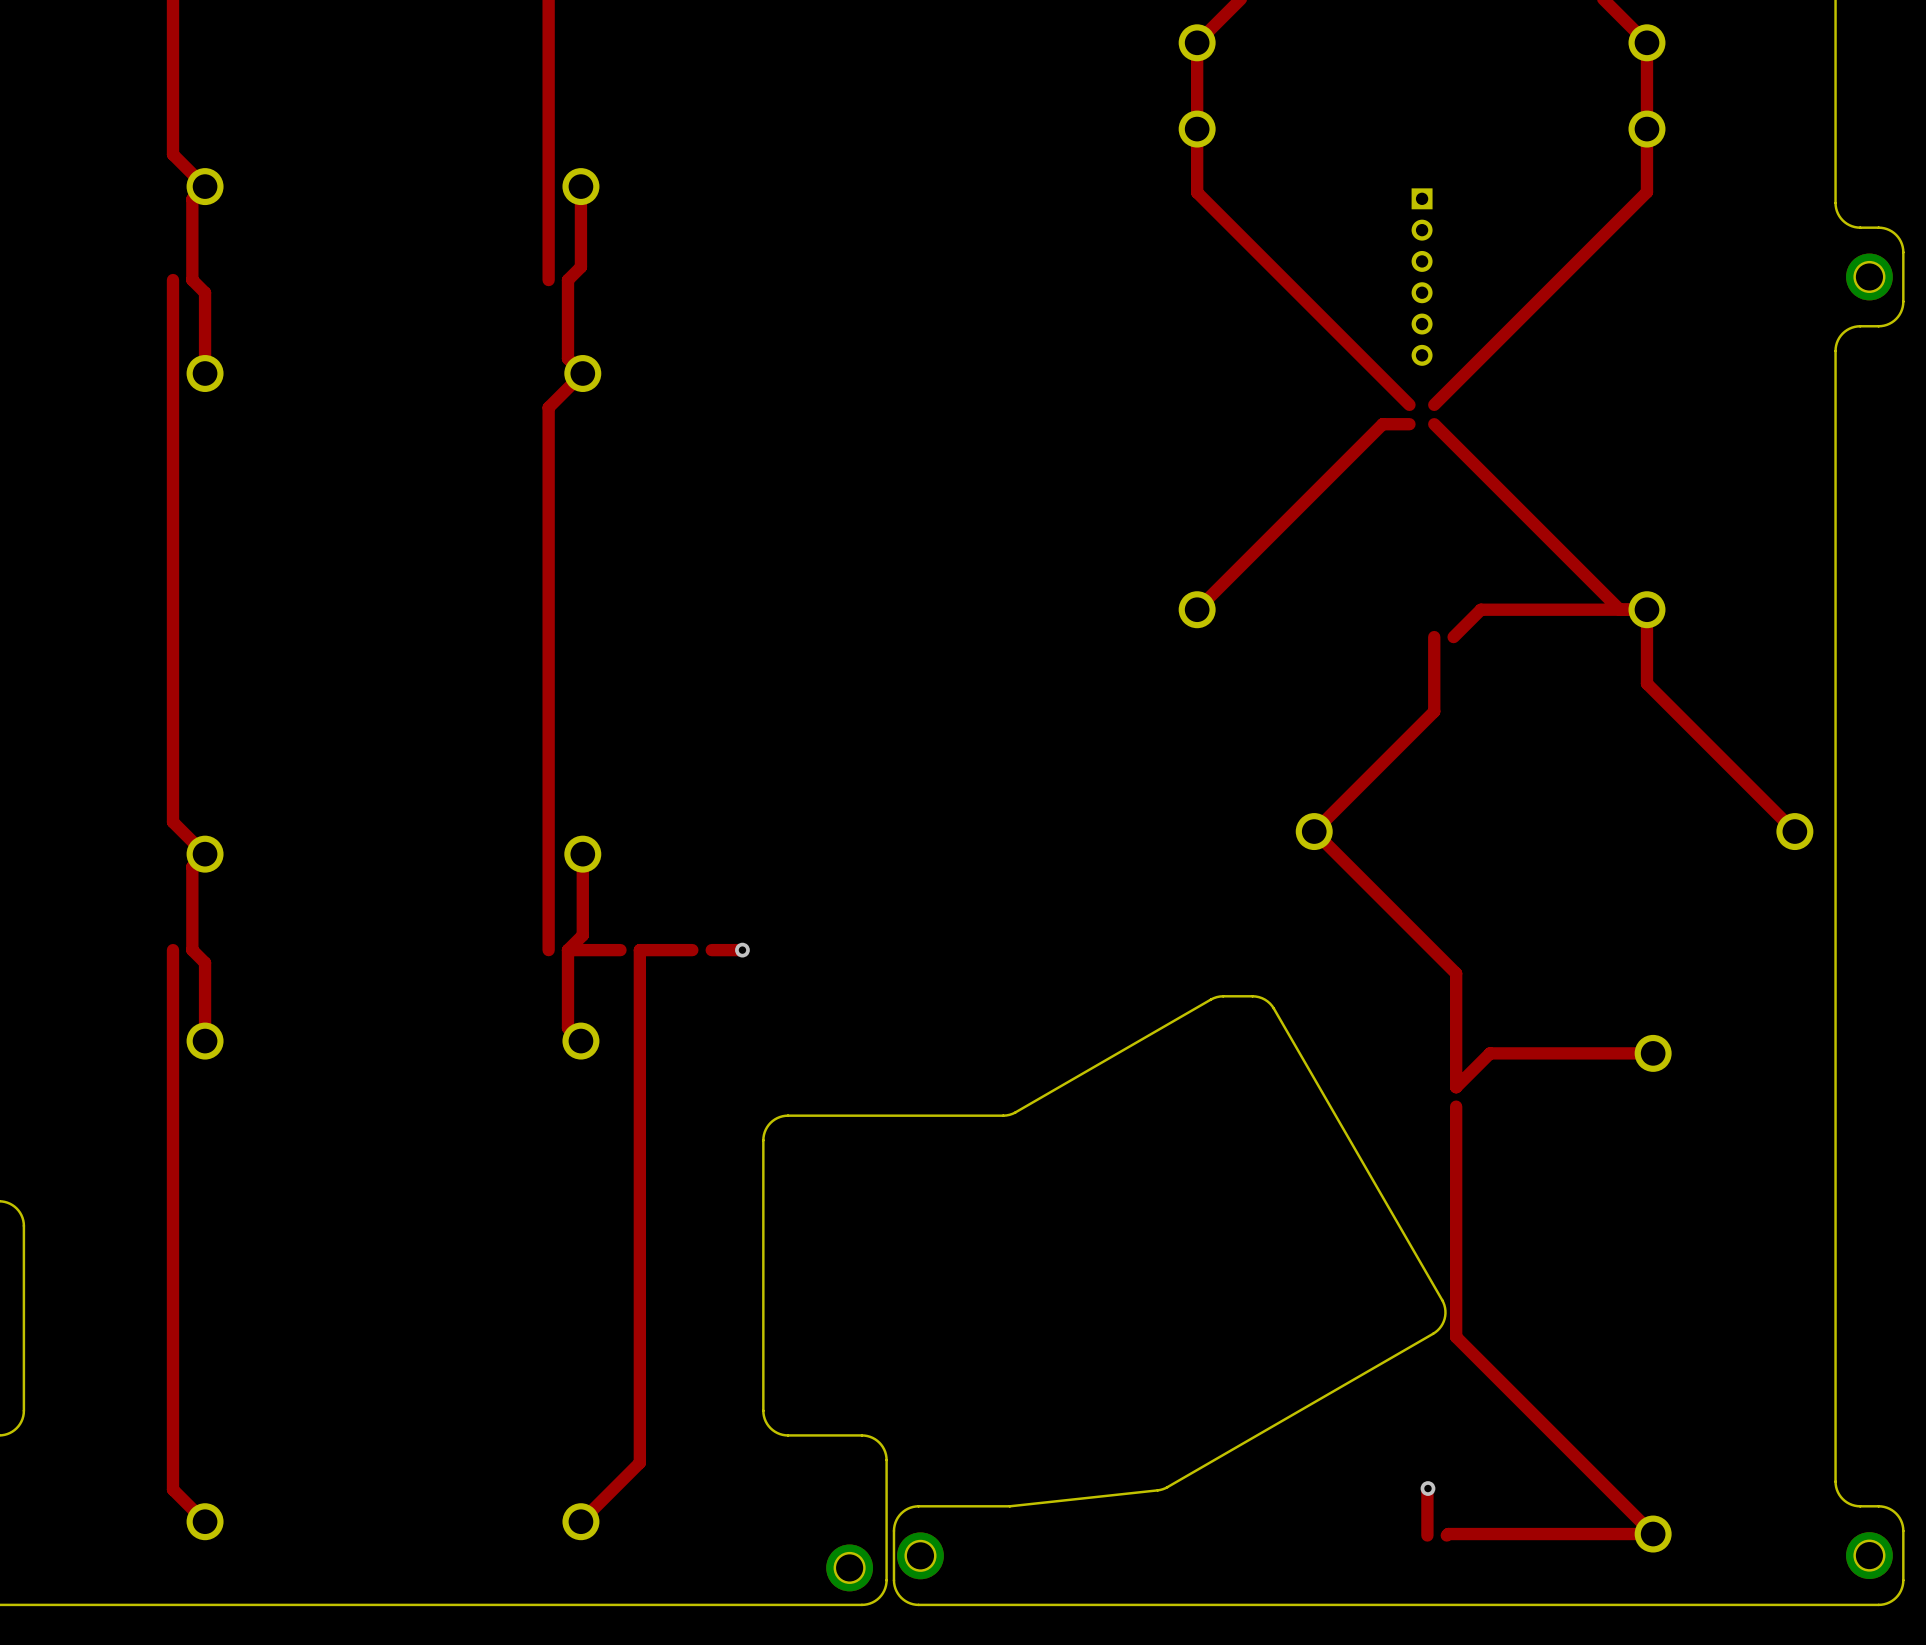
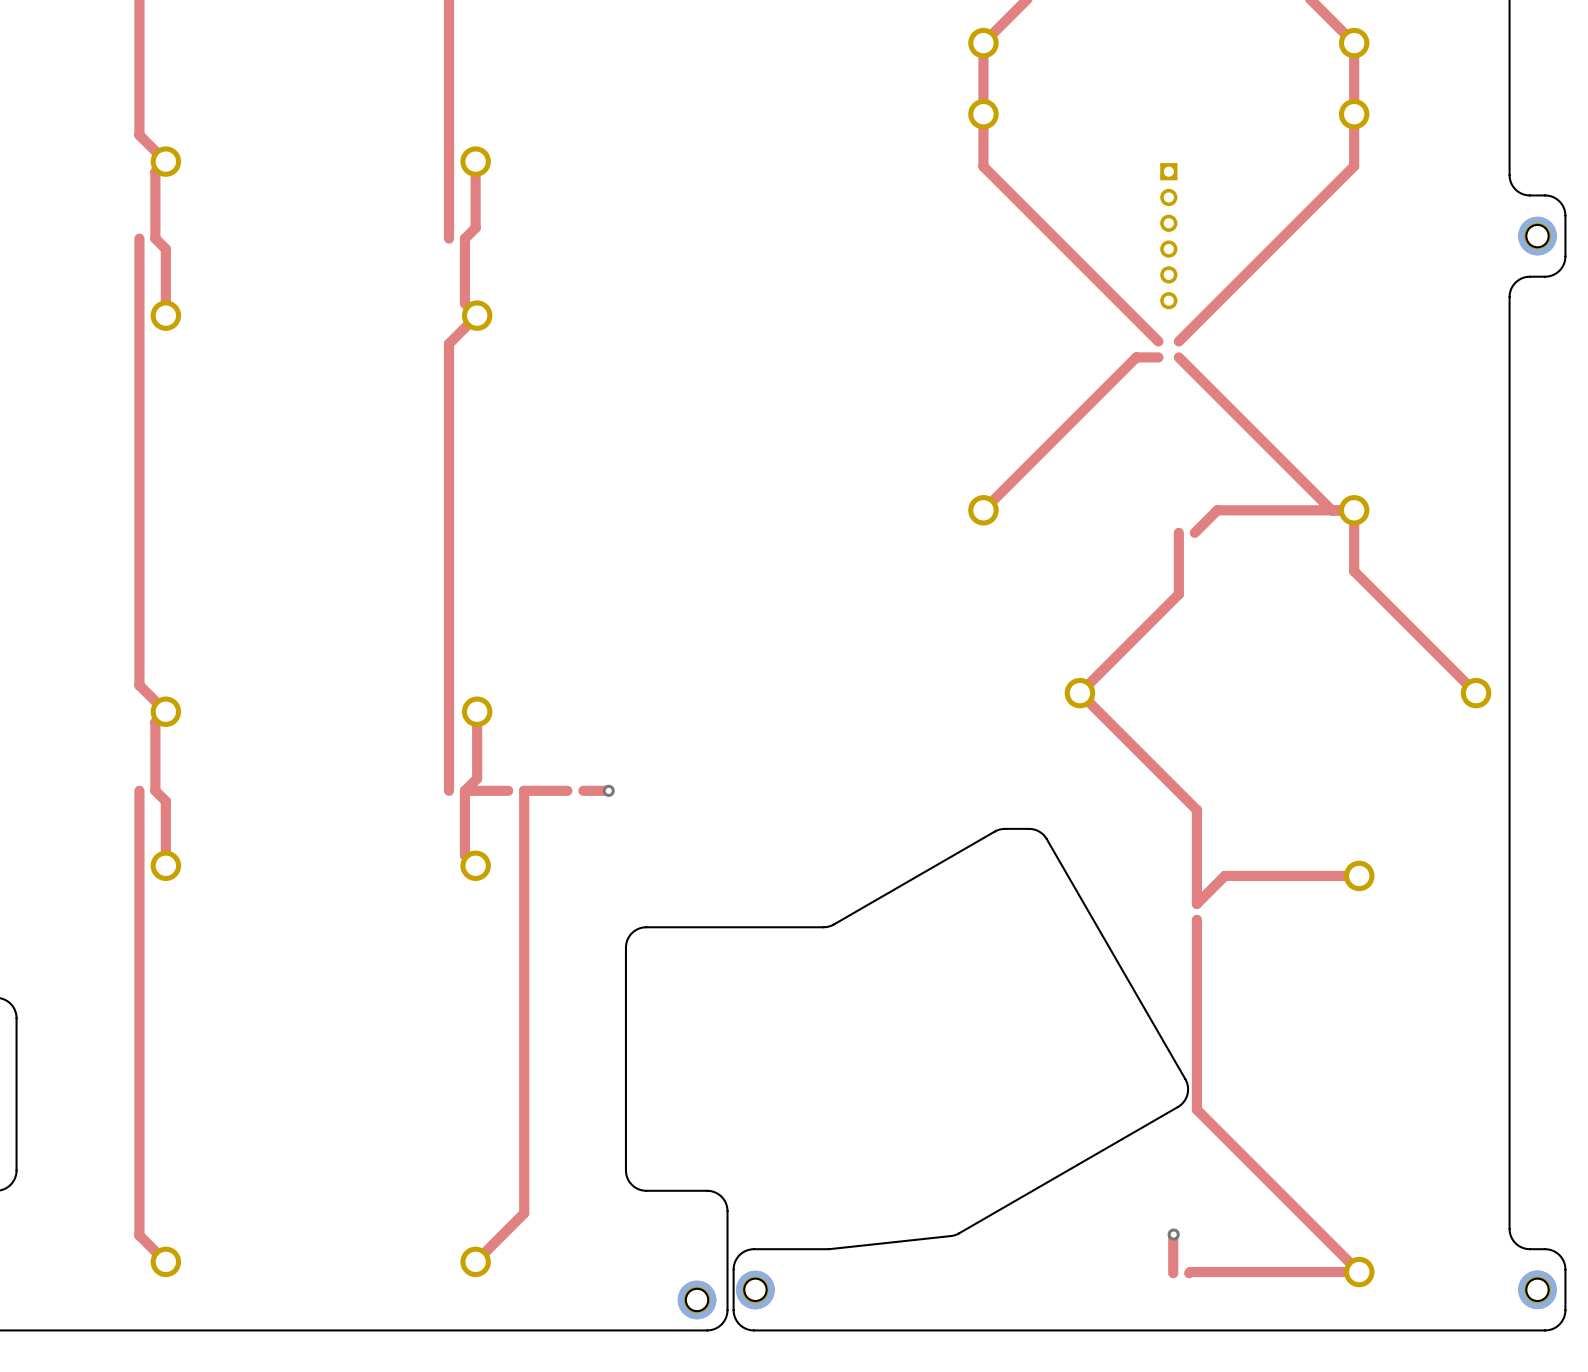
round board edge: none -> [1525, 223, 1550, 249]
round board edge: none -> [743, 1277, 768, 1303]
round board edge: none -> [1525, 1277, 1550, 1303]
round board edge: none -> [684, 1287, 710, 1313]

